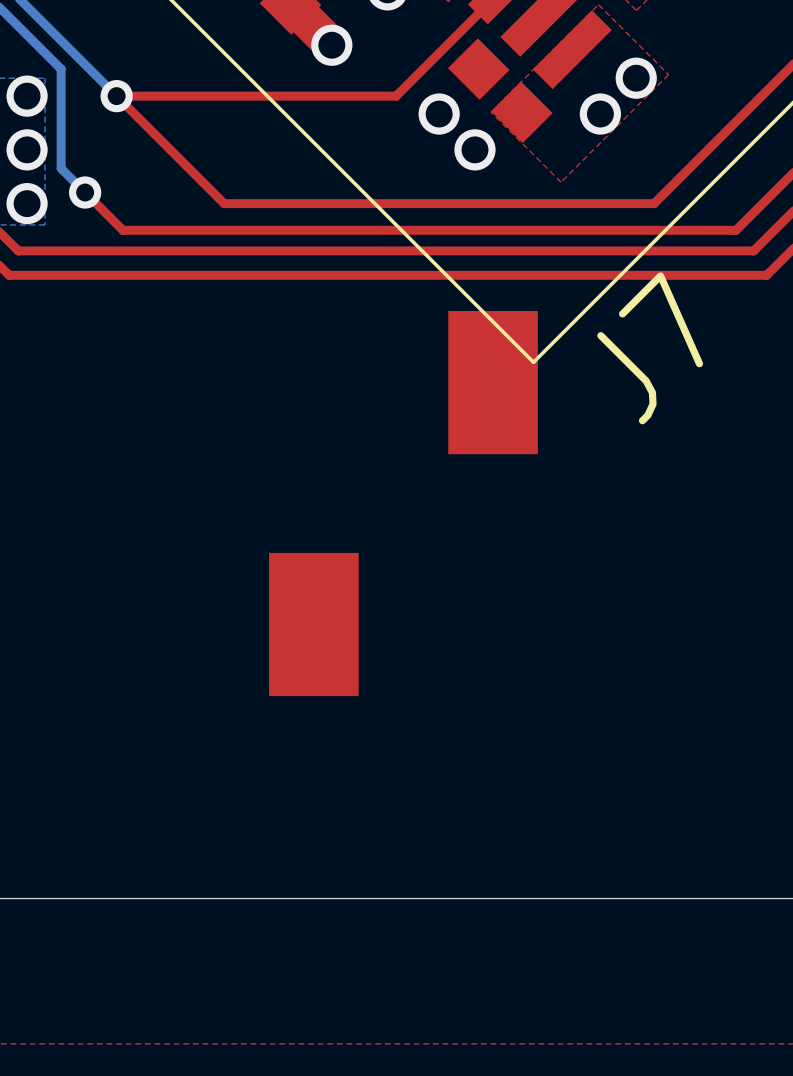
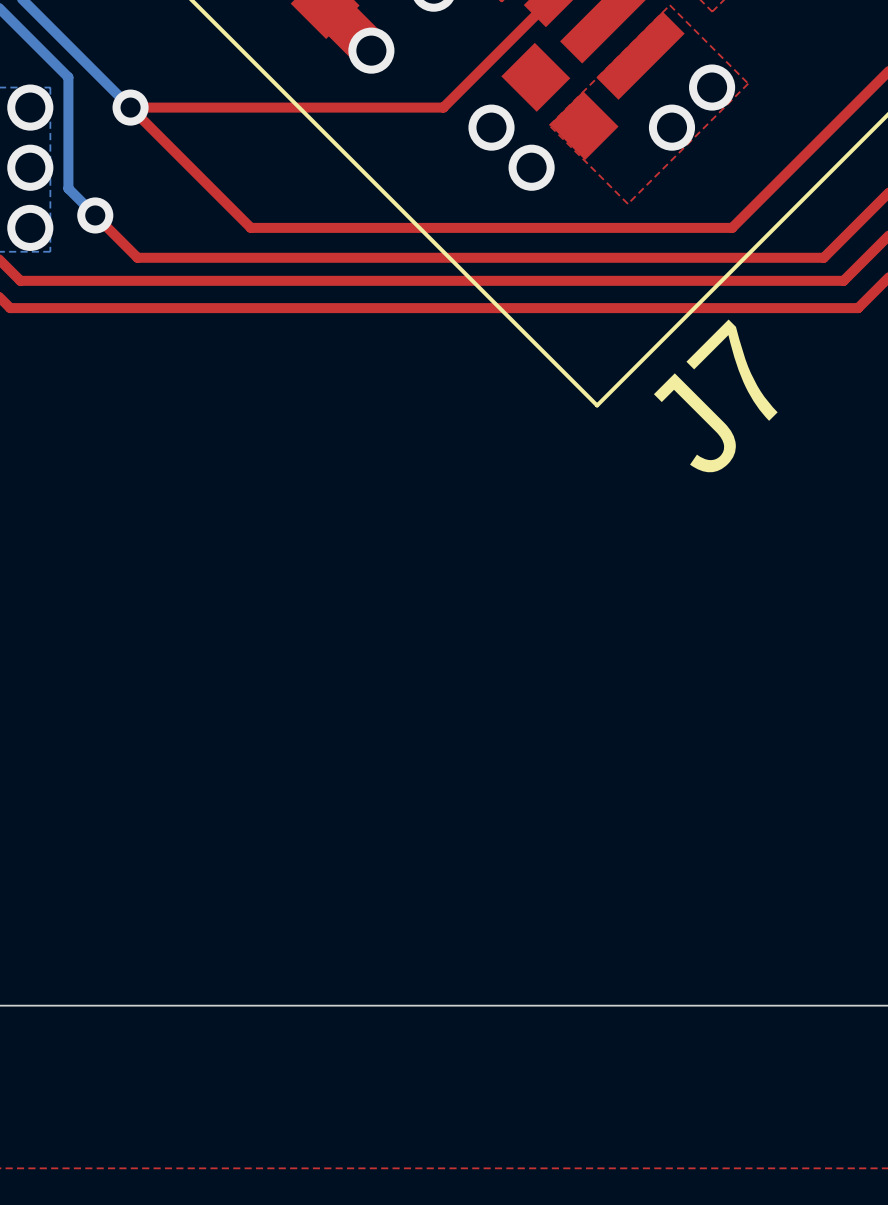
part: (403, 503) -> none

